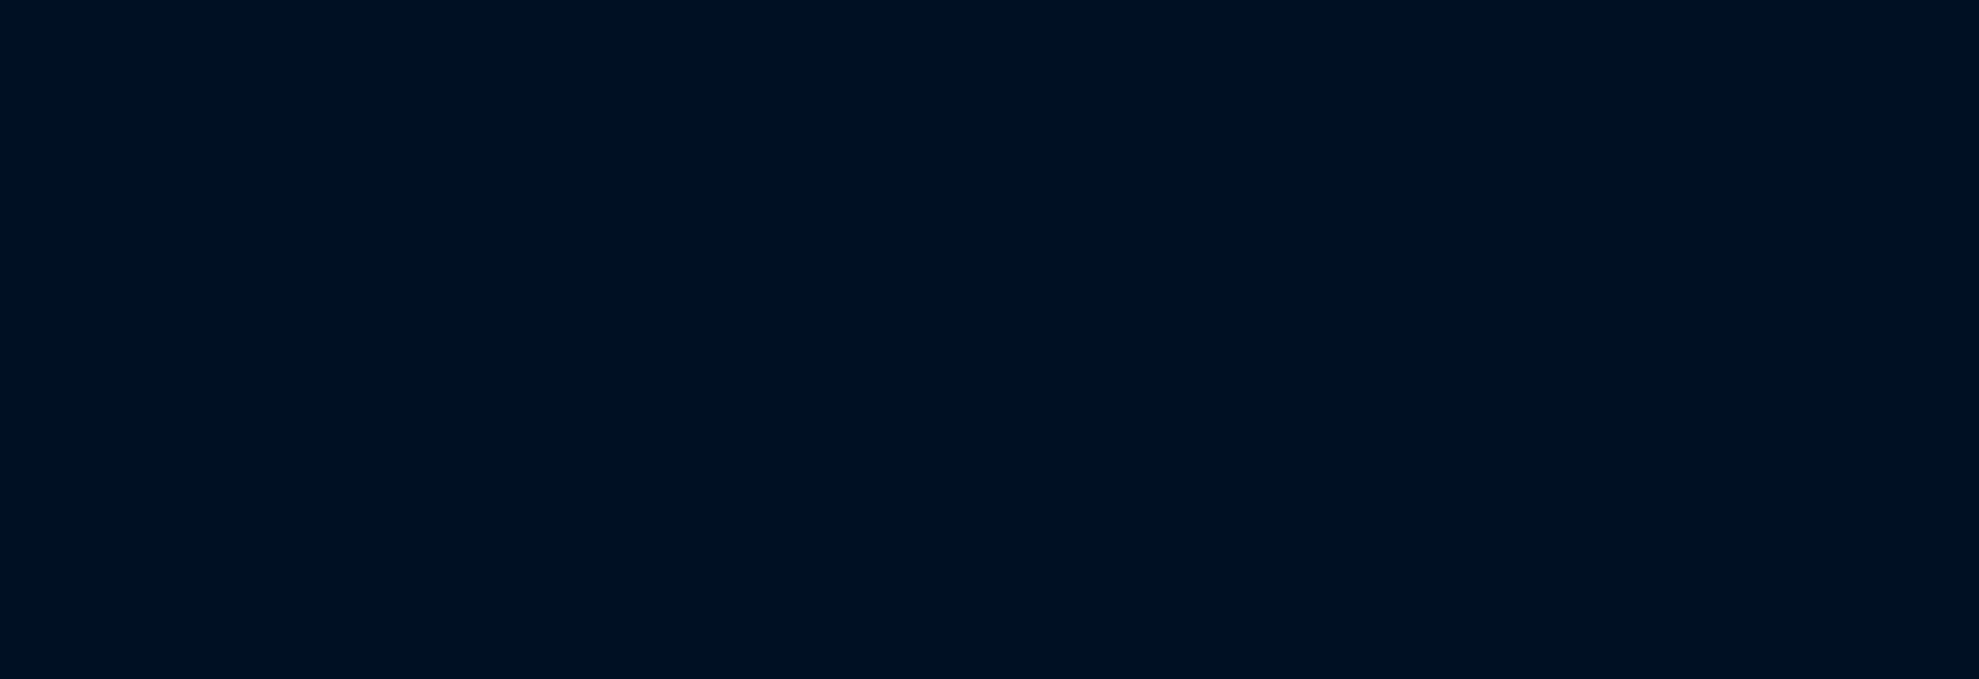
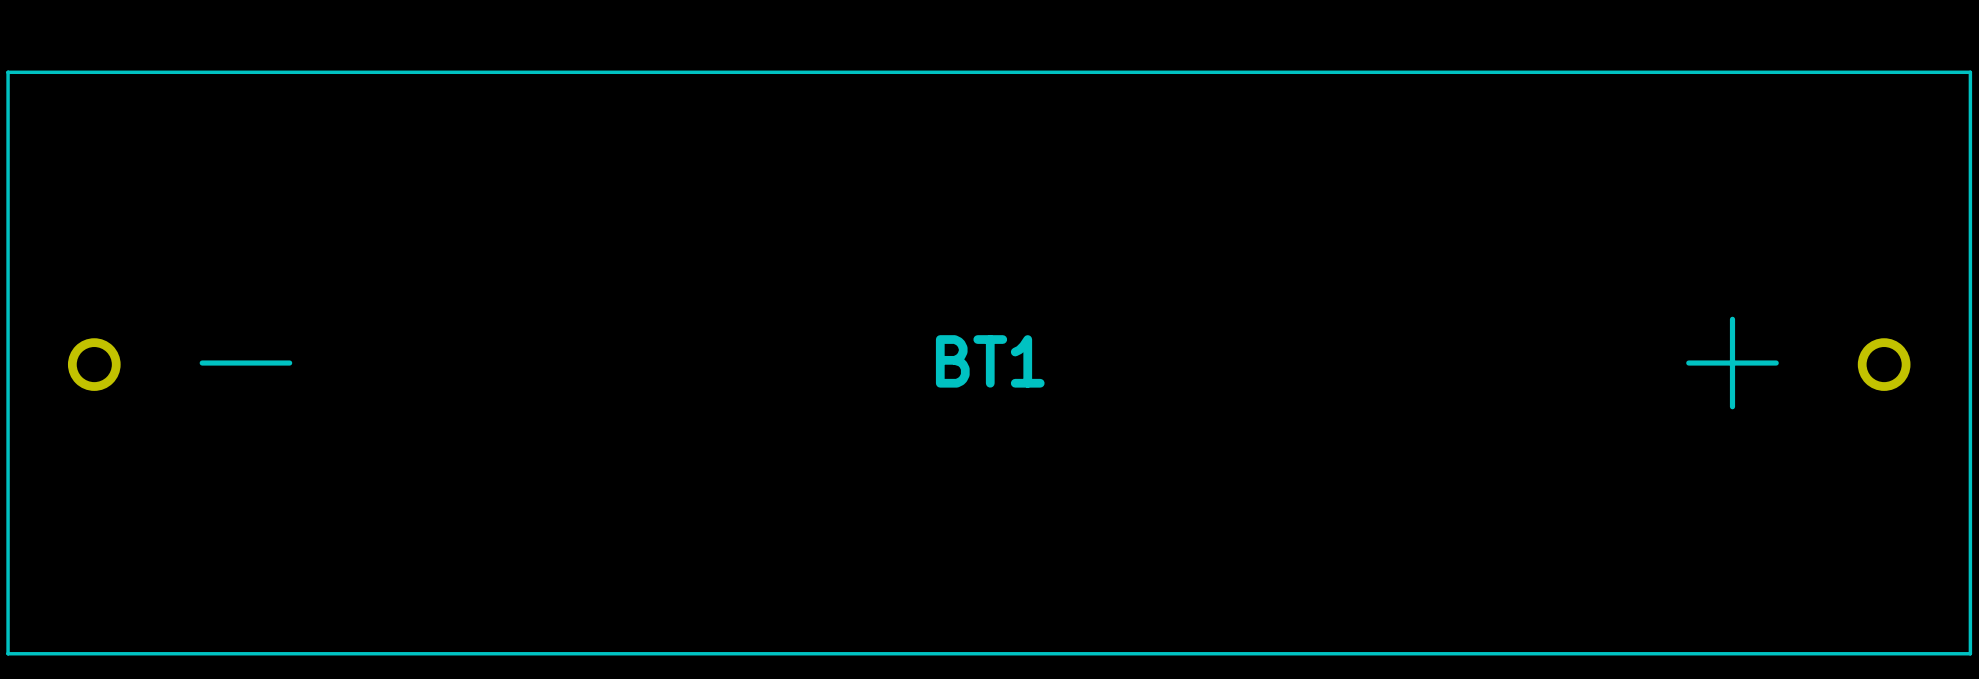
BT1: none -> (989, 363)

